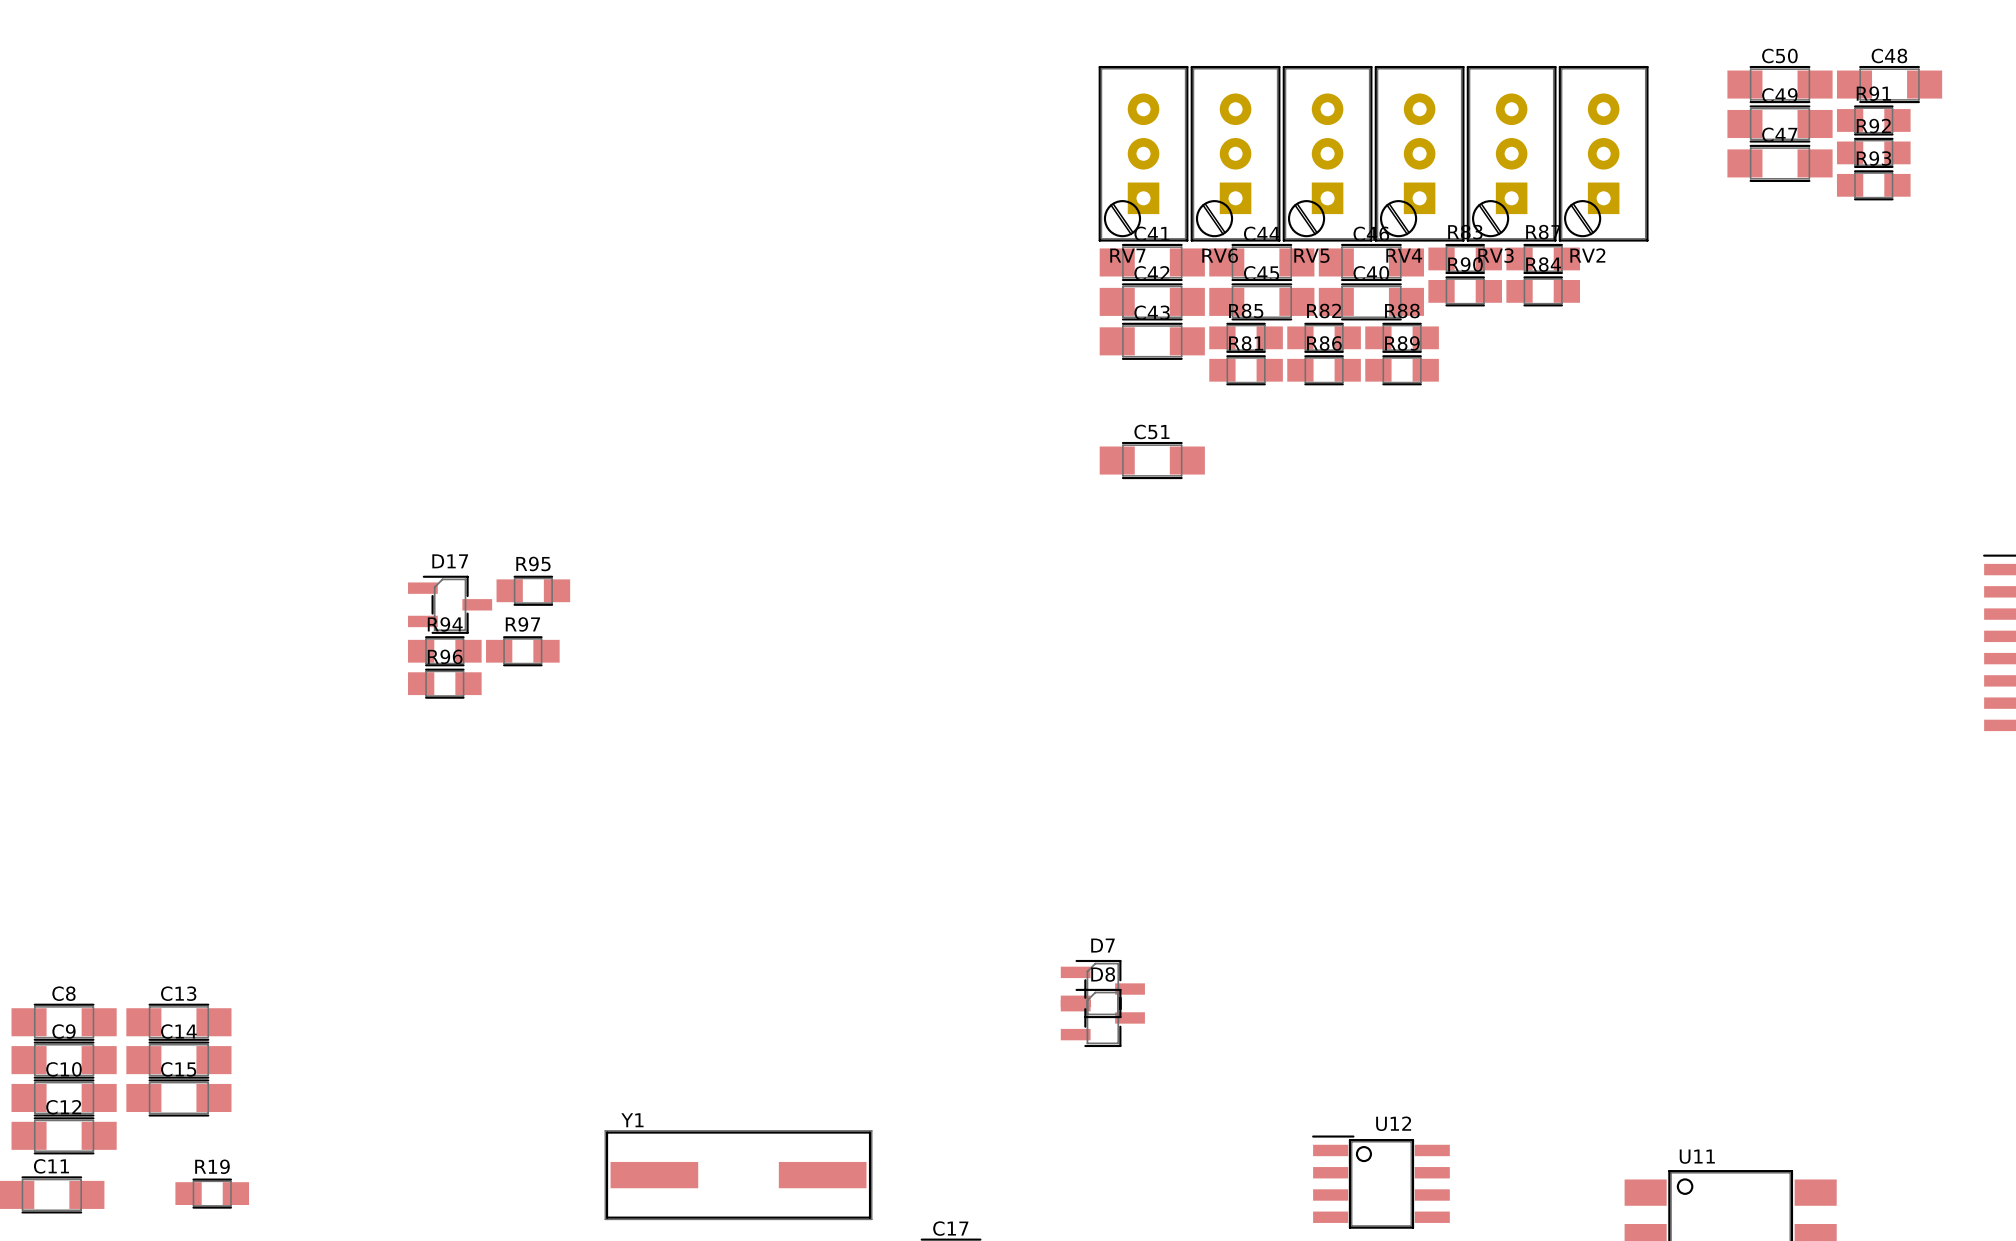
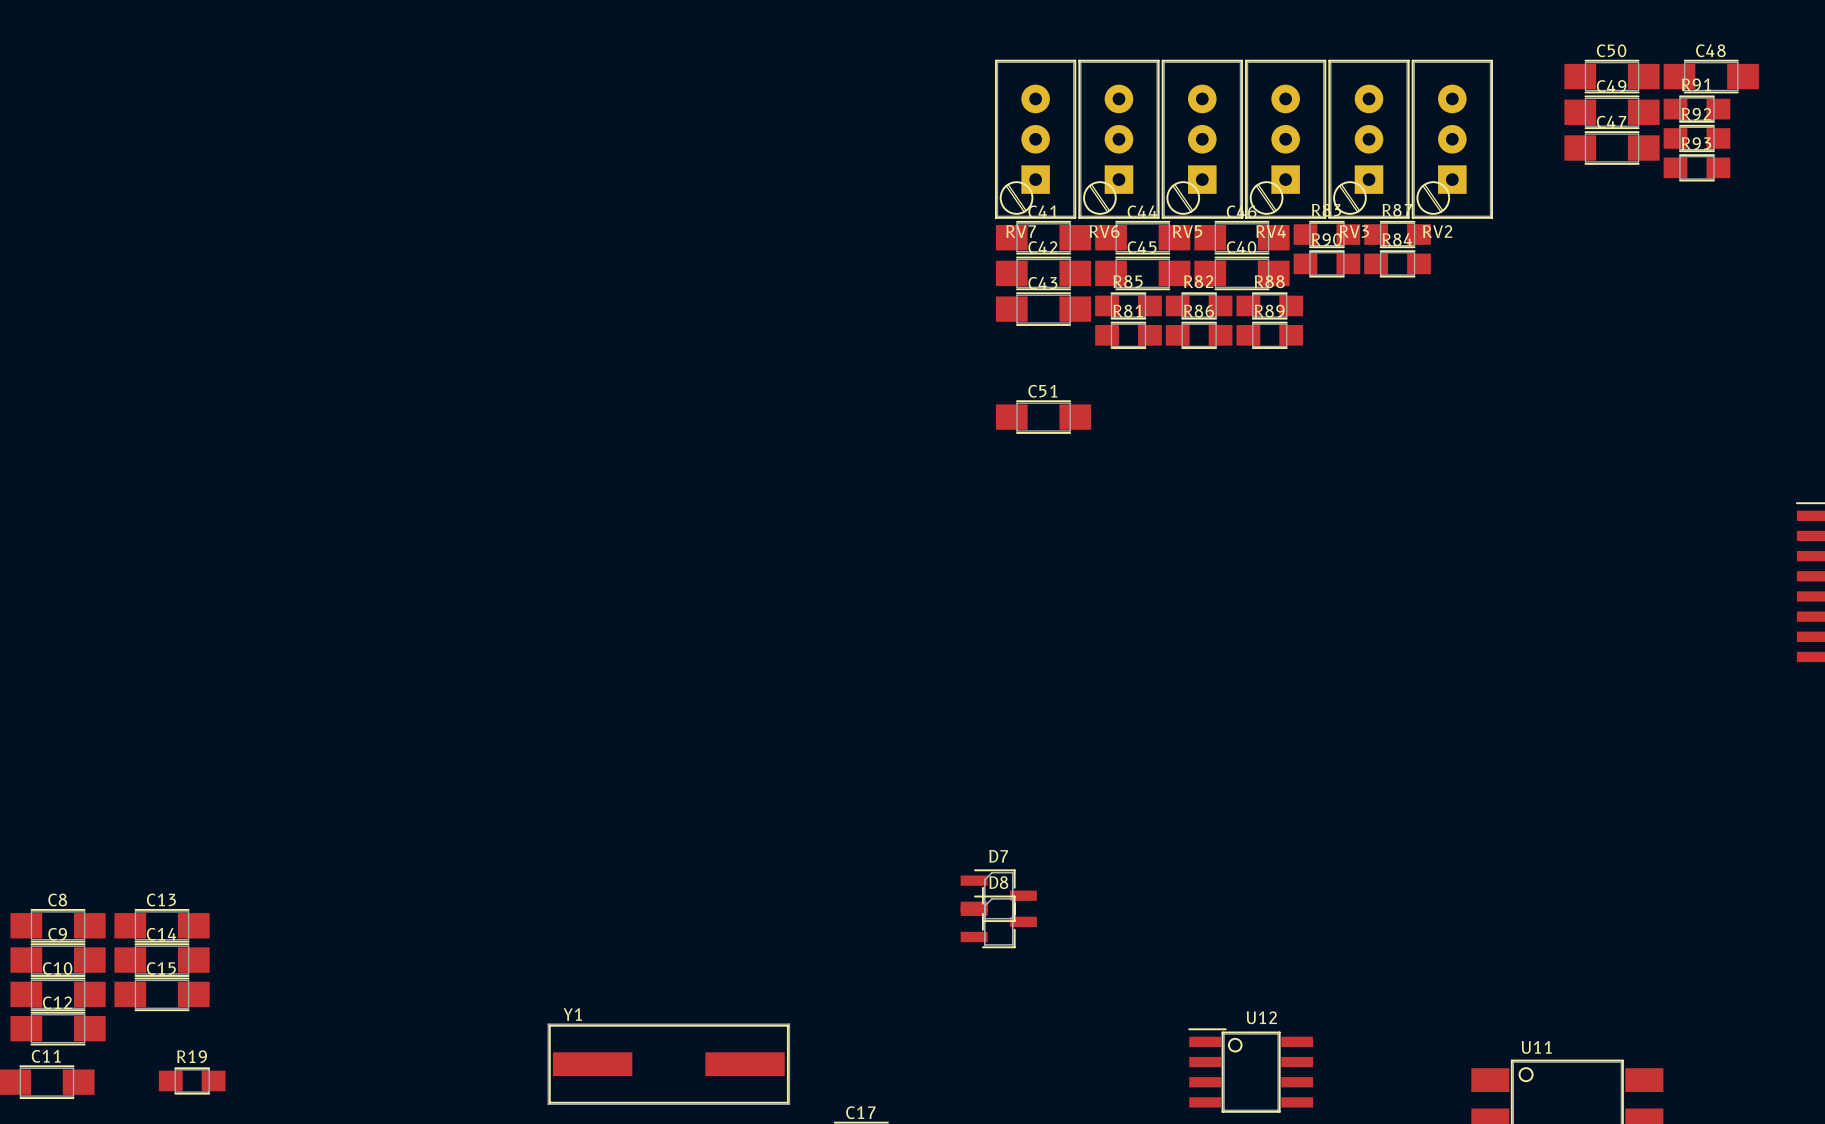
R95: (533, 590) -> none
D17: (450, 604) -> none
R94: (444, 651) -> none
R97: (522, 651) -> none
R96: (444, 683) -> none

